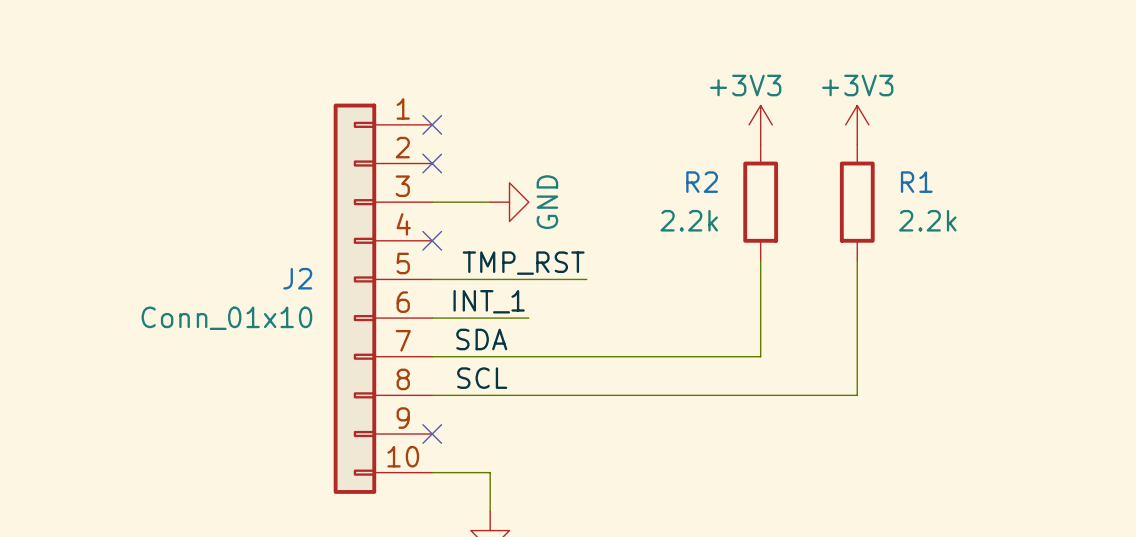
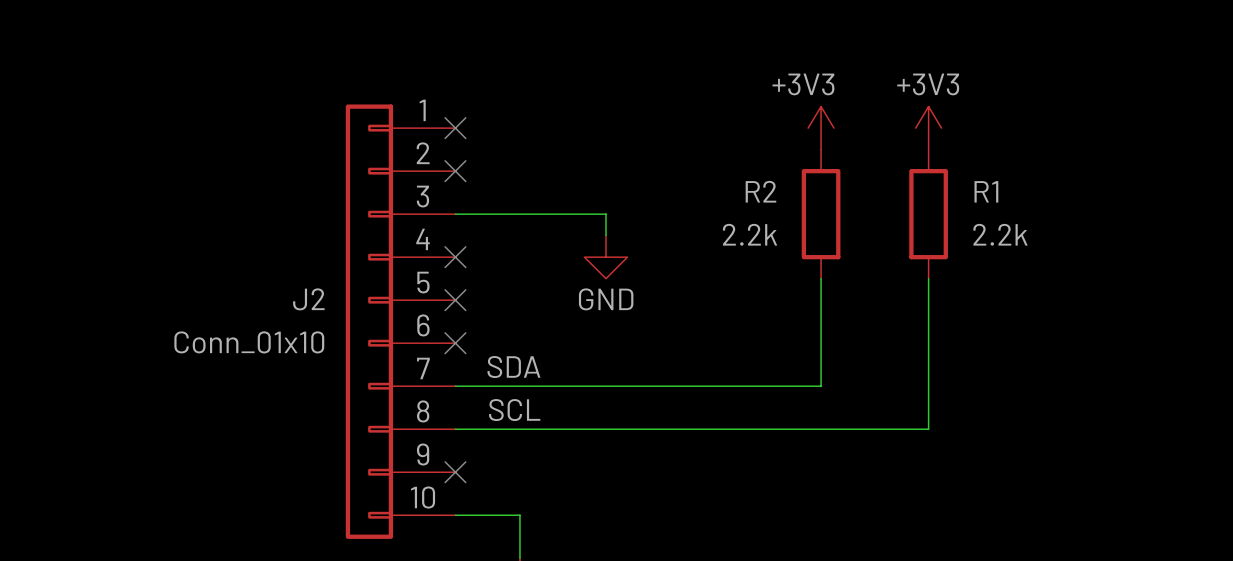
wire: none -> (519, 214) (606, 214) (606, 235)
power symbol rotation: 0° (509, 202) -> 90° clockwise (606, 257)
power symbol position: GND (509, 202) -> GND (606, 257)
label: TMP_RST (523, 263) -> none
wire: (432, 279) (586, 279) -> none
no-connect mark: none -> (455, 300)
label: INT_1 (489, 301) -> none
wire: (432, 318) (528, 318) -> none
no-connect mark: none -> (455, 343)

